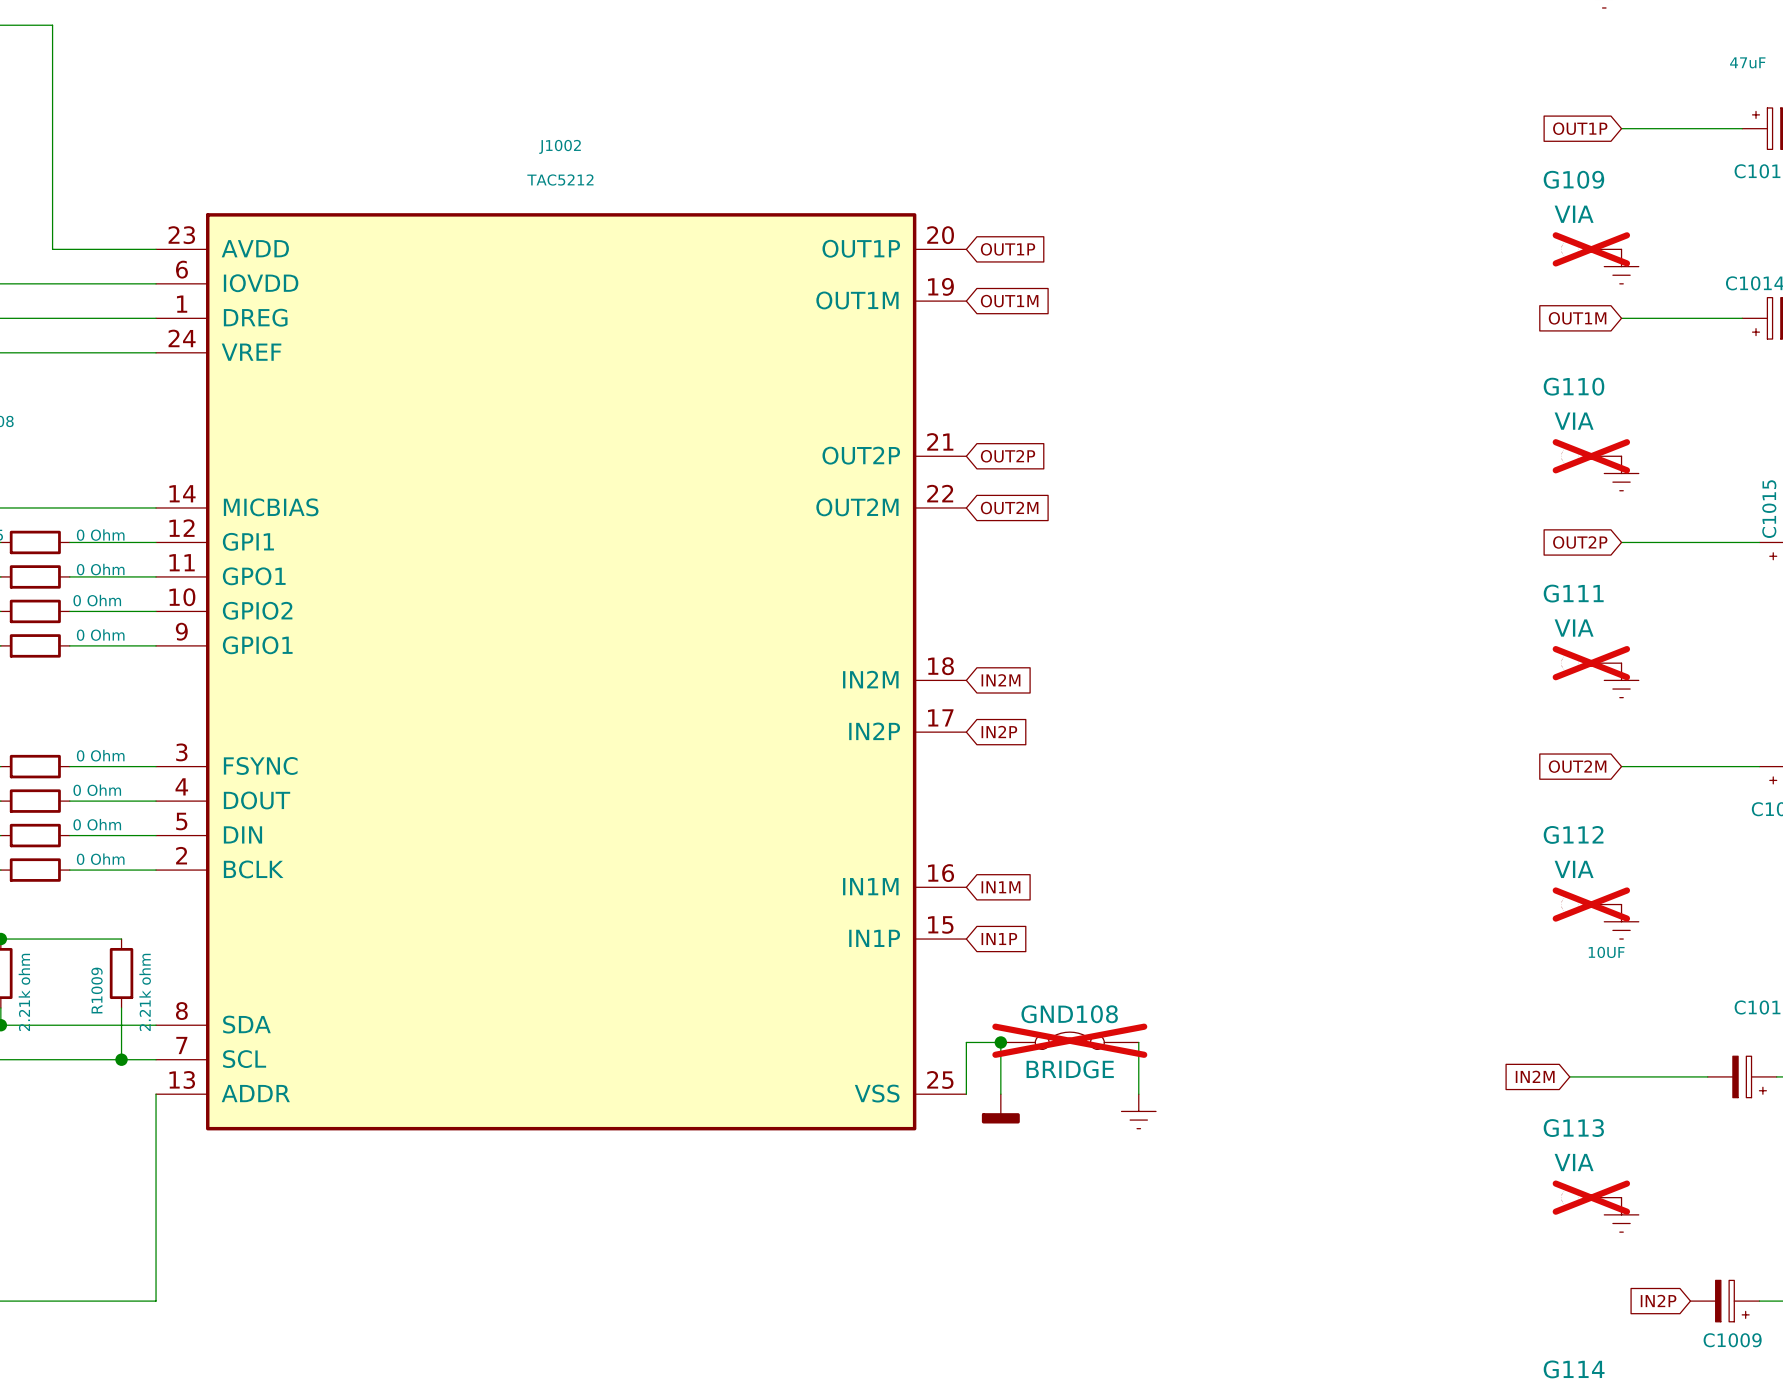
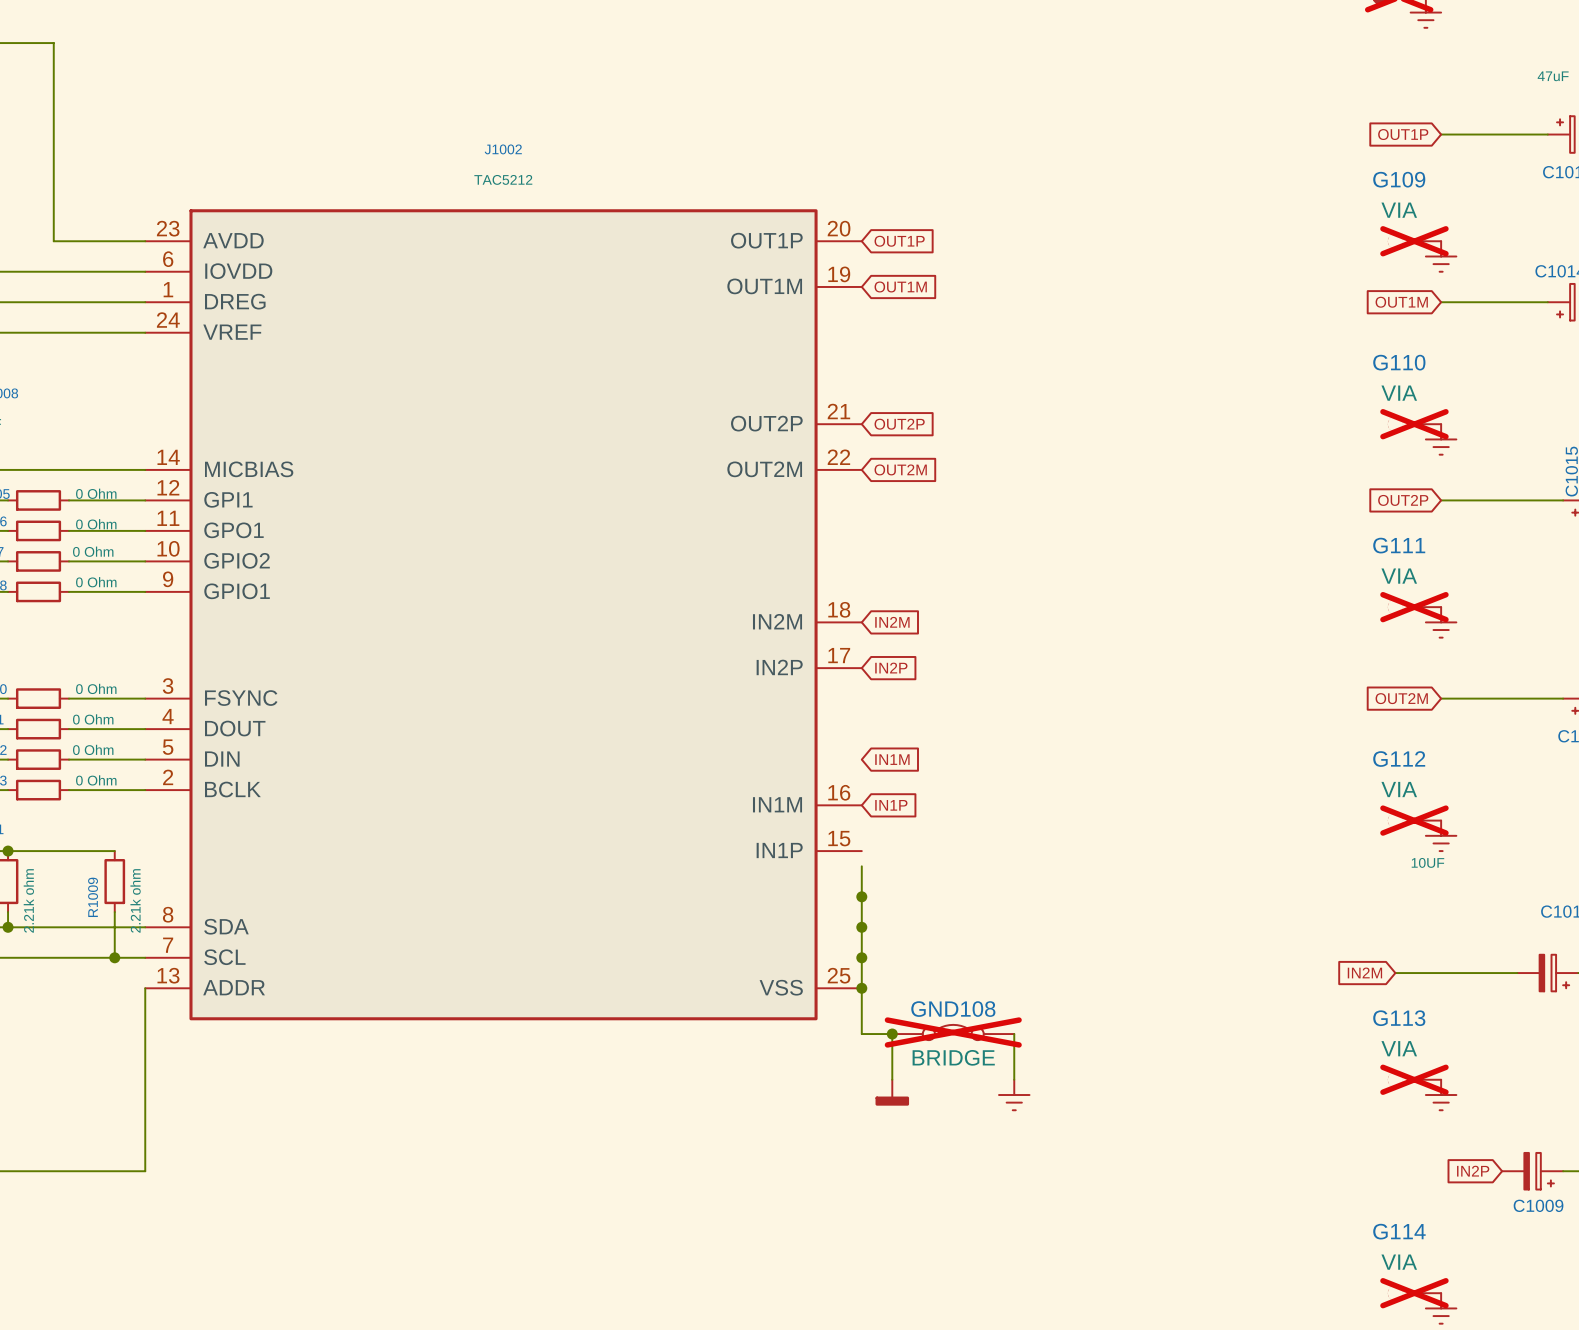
global label: none -> IN1M (892, 759)
global label: IN1M (1000, 887) -> IN1P (891, 805)
global label: IN1P (999, 939) -> none
junction: none -> (861, 896)
junction: none -> (861, 927)
GND108 position: (1069, 1040) -> (953, 1032)
wire: (966, 1042) (1000, 1042) (1000, 1094) -> (861, 942) (861, 866)
junction: (1000, 1042) -> none
wire: (1138, 1042) (1138, 1094) -> (1014, 1034) (1014, 1079)
junction: none -> (861, 957)
wire: none -> (861, 988) (861, 1034) (892, 1034) (892, 1079)
junction: none -> (861, 988)
power symbol position: (1000, 1108) -> (892, 1092)
power symbol position: (1138, 1111) -> (1014, 1095)
junction: none -> (892, 1034)

